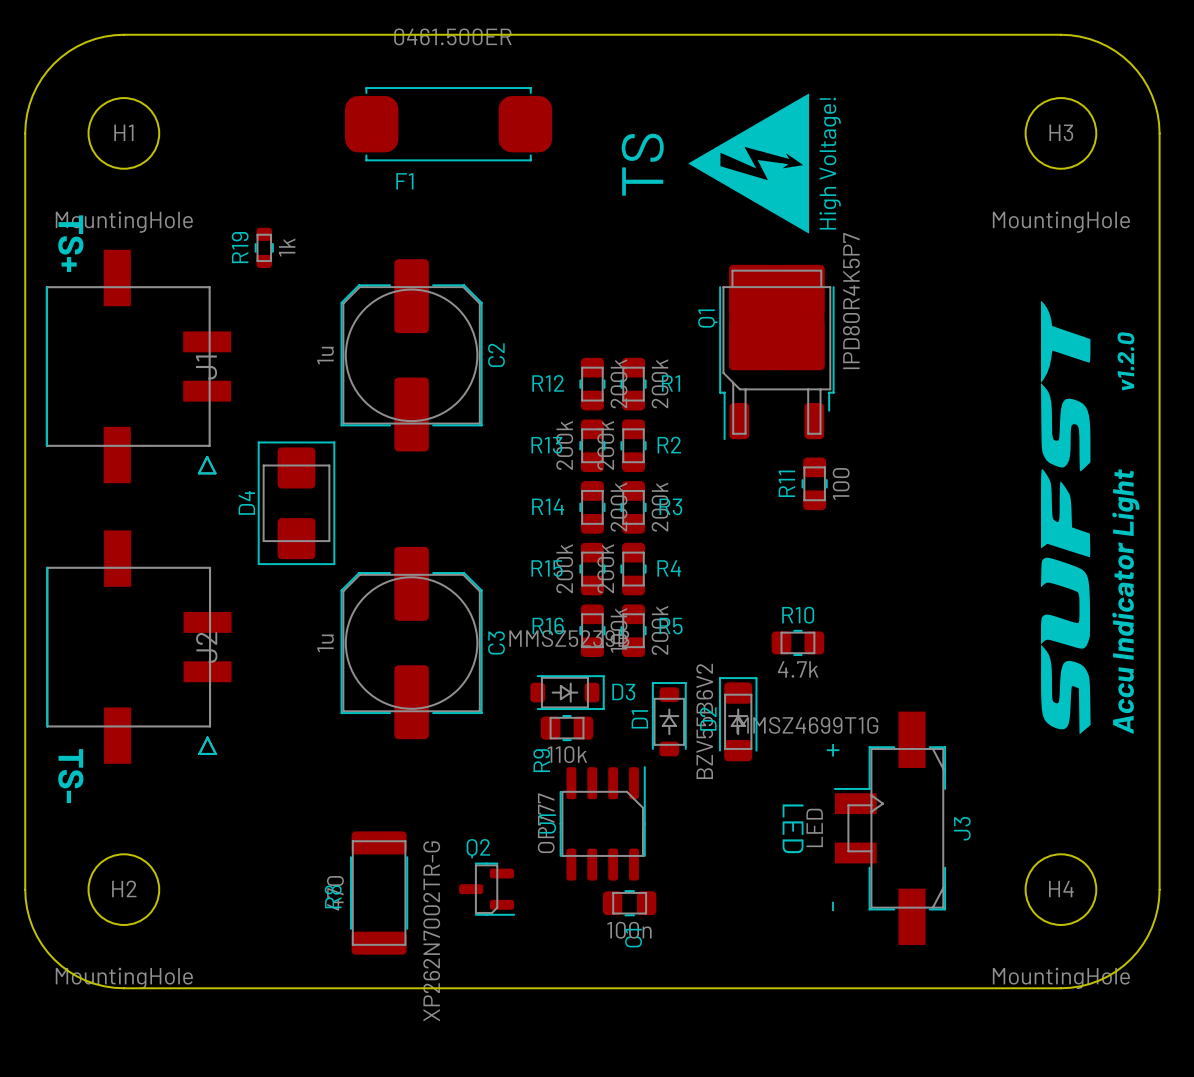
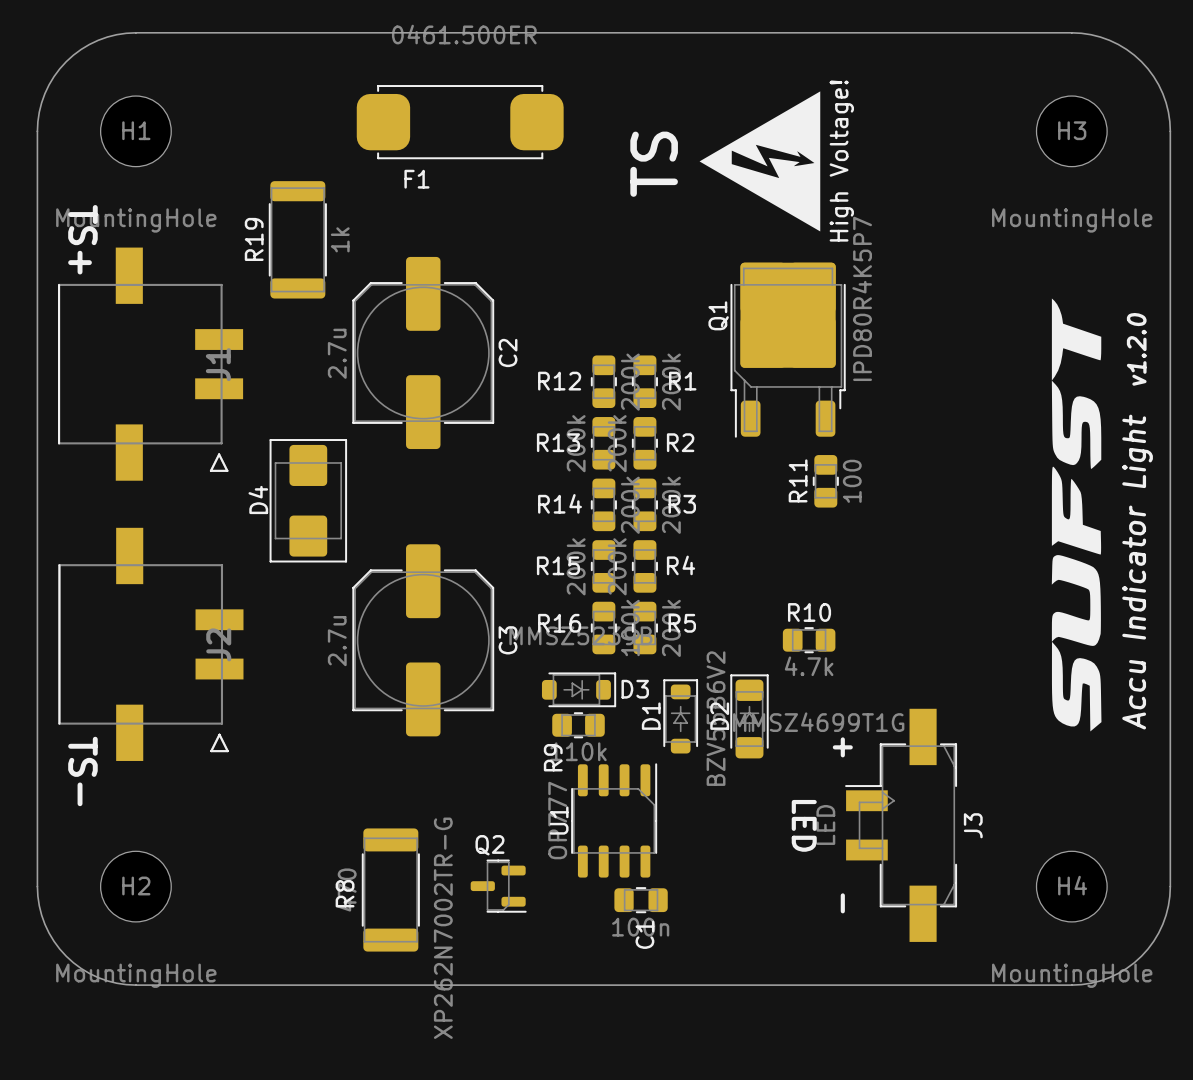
R19 footprint: [254, 227, 274, 269] -> [268, 181, 327, 299]
C2 value: 1u (325, 355) -> 2.7u (337, 353)
C3 value: 1u (325, 643) -> 2.7u (337, 641)

